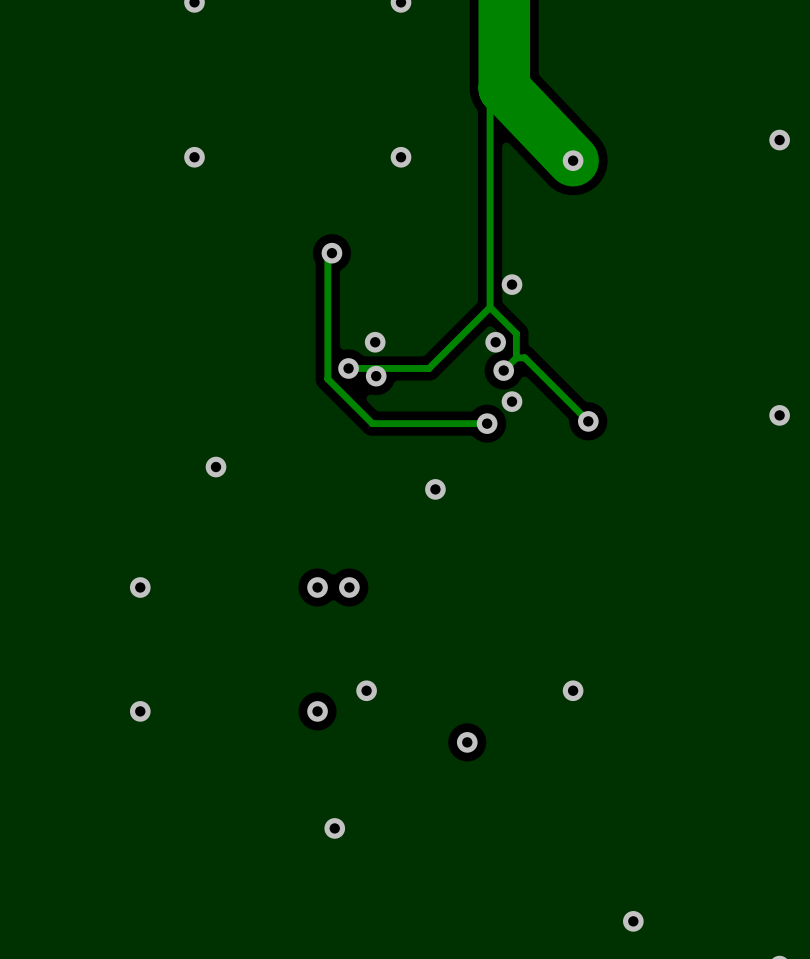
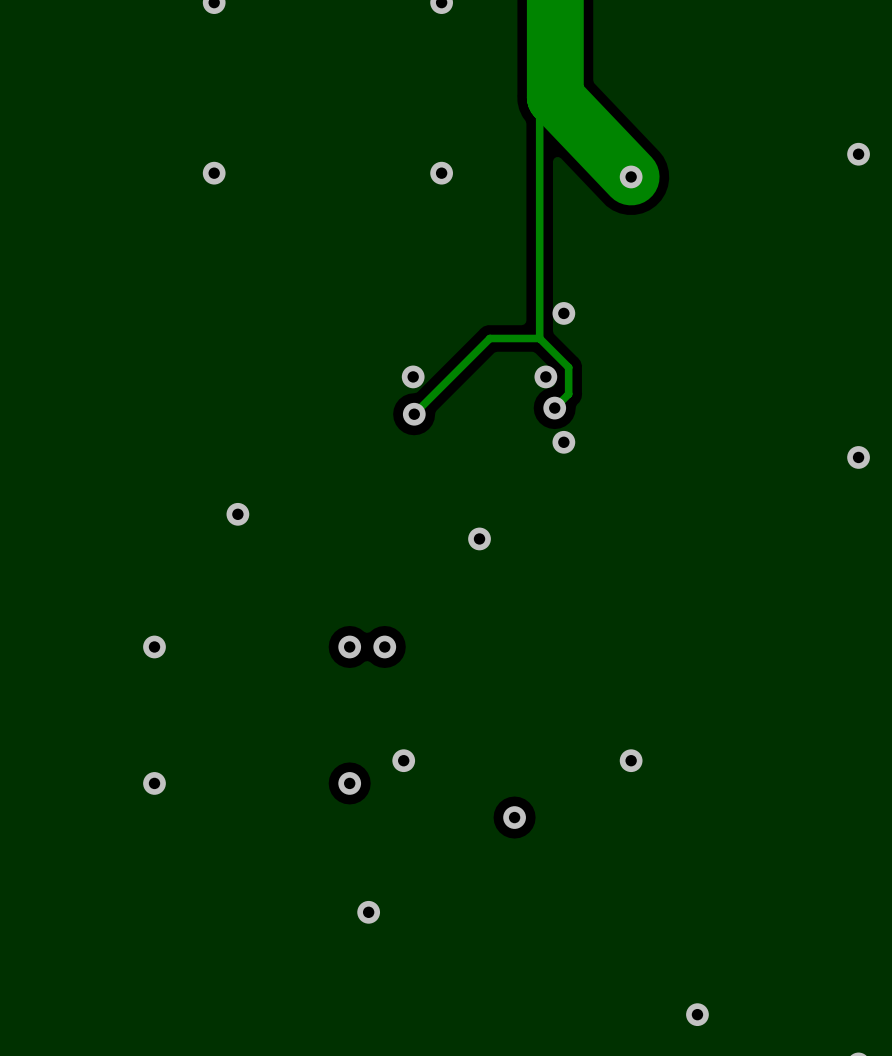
track: (331, 253) (327, 257) (327, 379) (372, 423) (487, 423) -> none
via: (331, 253) -> none
track: (490, 307) (428, 368) (348, 368) -> (539, 338) (489, 338) (414, 414)
track: (516, 357) (524, 357) (588, 421) -> none
via: (348, 368) -> none
via: (588, 421) -> none
via: (487, 423) -> none

